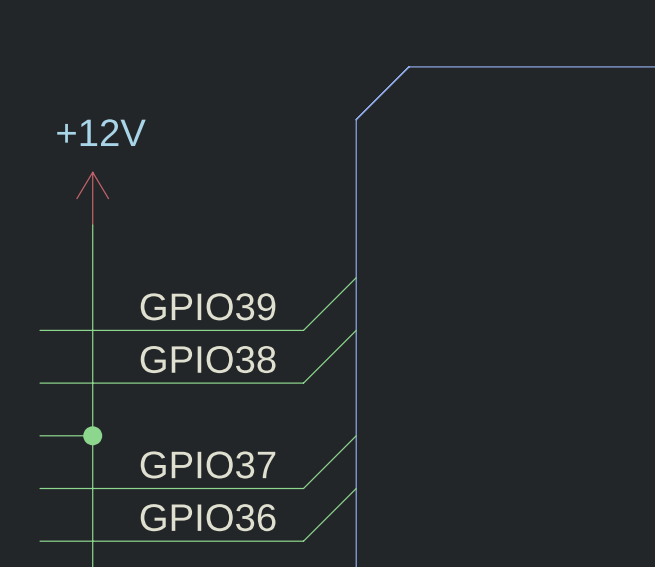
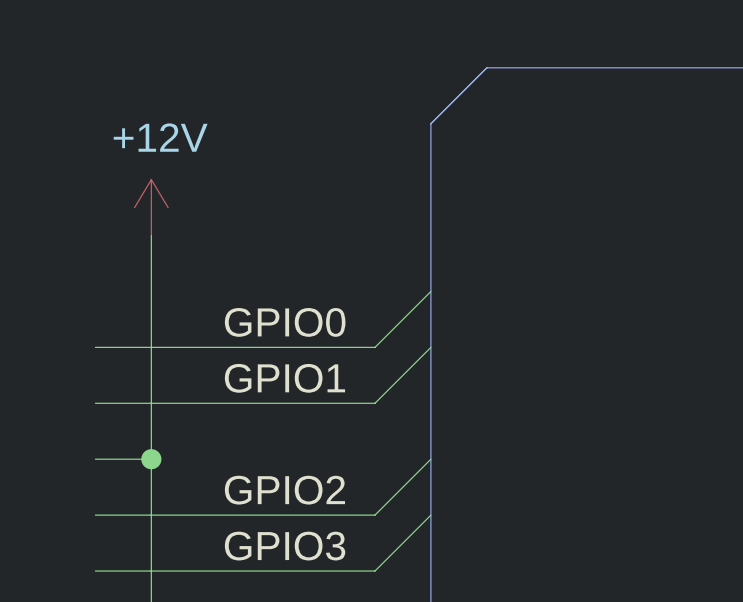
label: GPIO39 (208, 306) -> GPIO0 (285, 322)
label: GPIO38 (208, 359) -> GPIO1 (284, 378)
label: GPIO37 (207, 464) -> GPIO2 (284, 490)
label: GPIO36 (208, 517) -> GPIO3 (285, 546)

